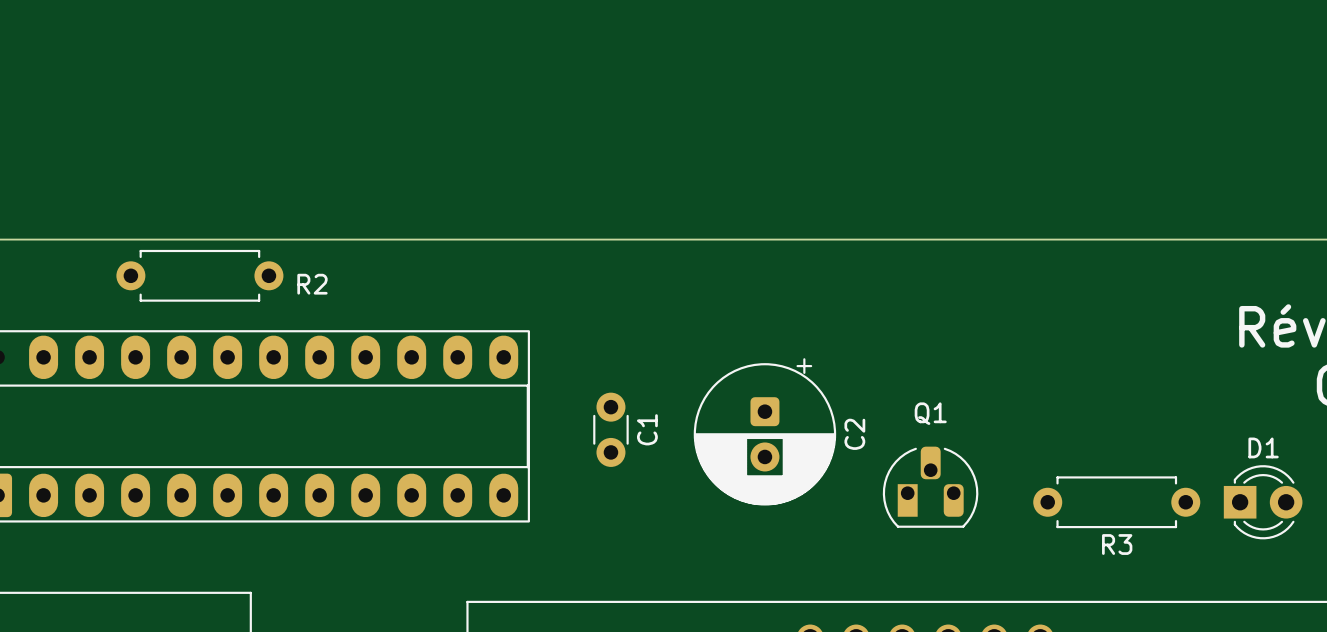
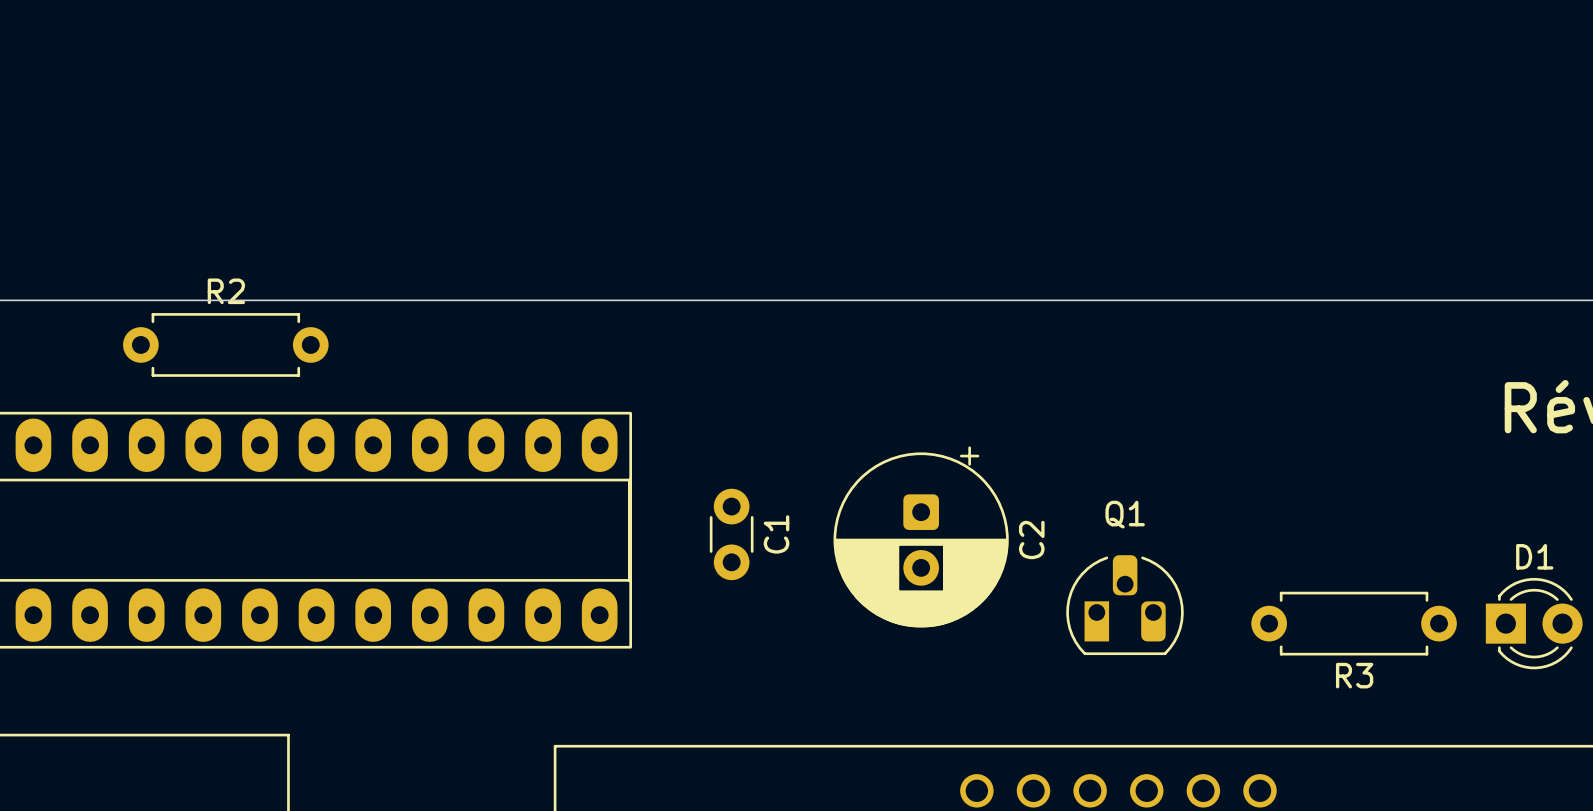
R2 name position: R2 (312, 284) -> R2 (226, 291)

